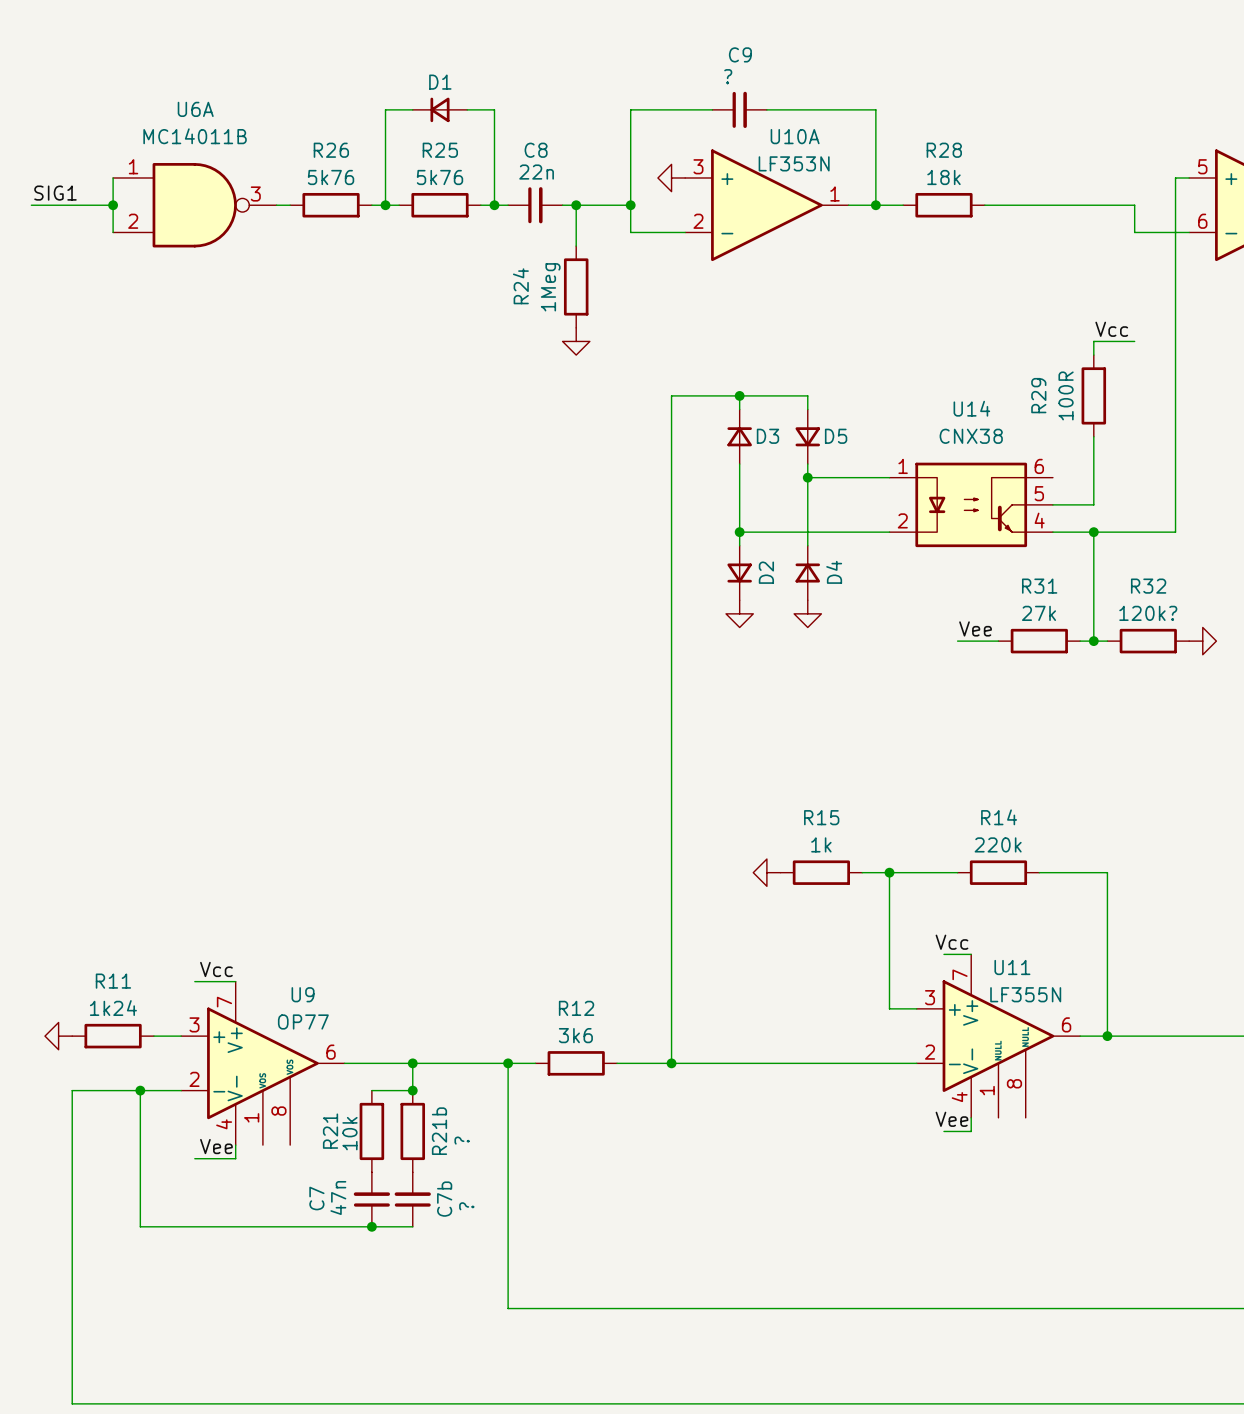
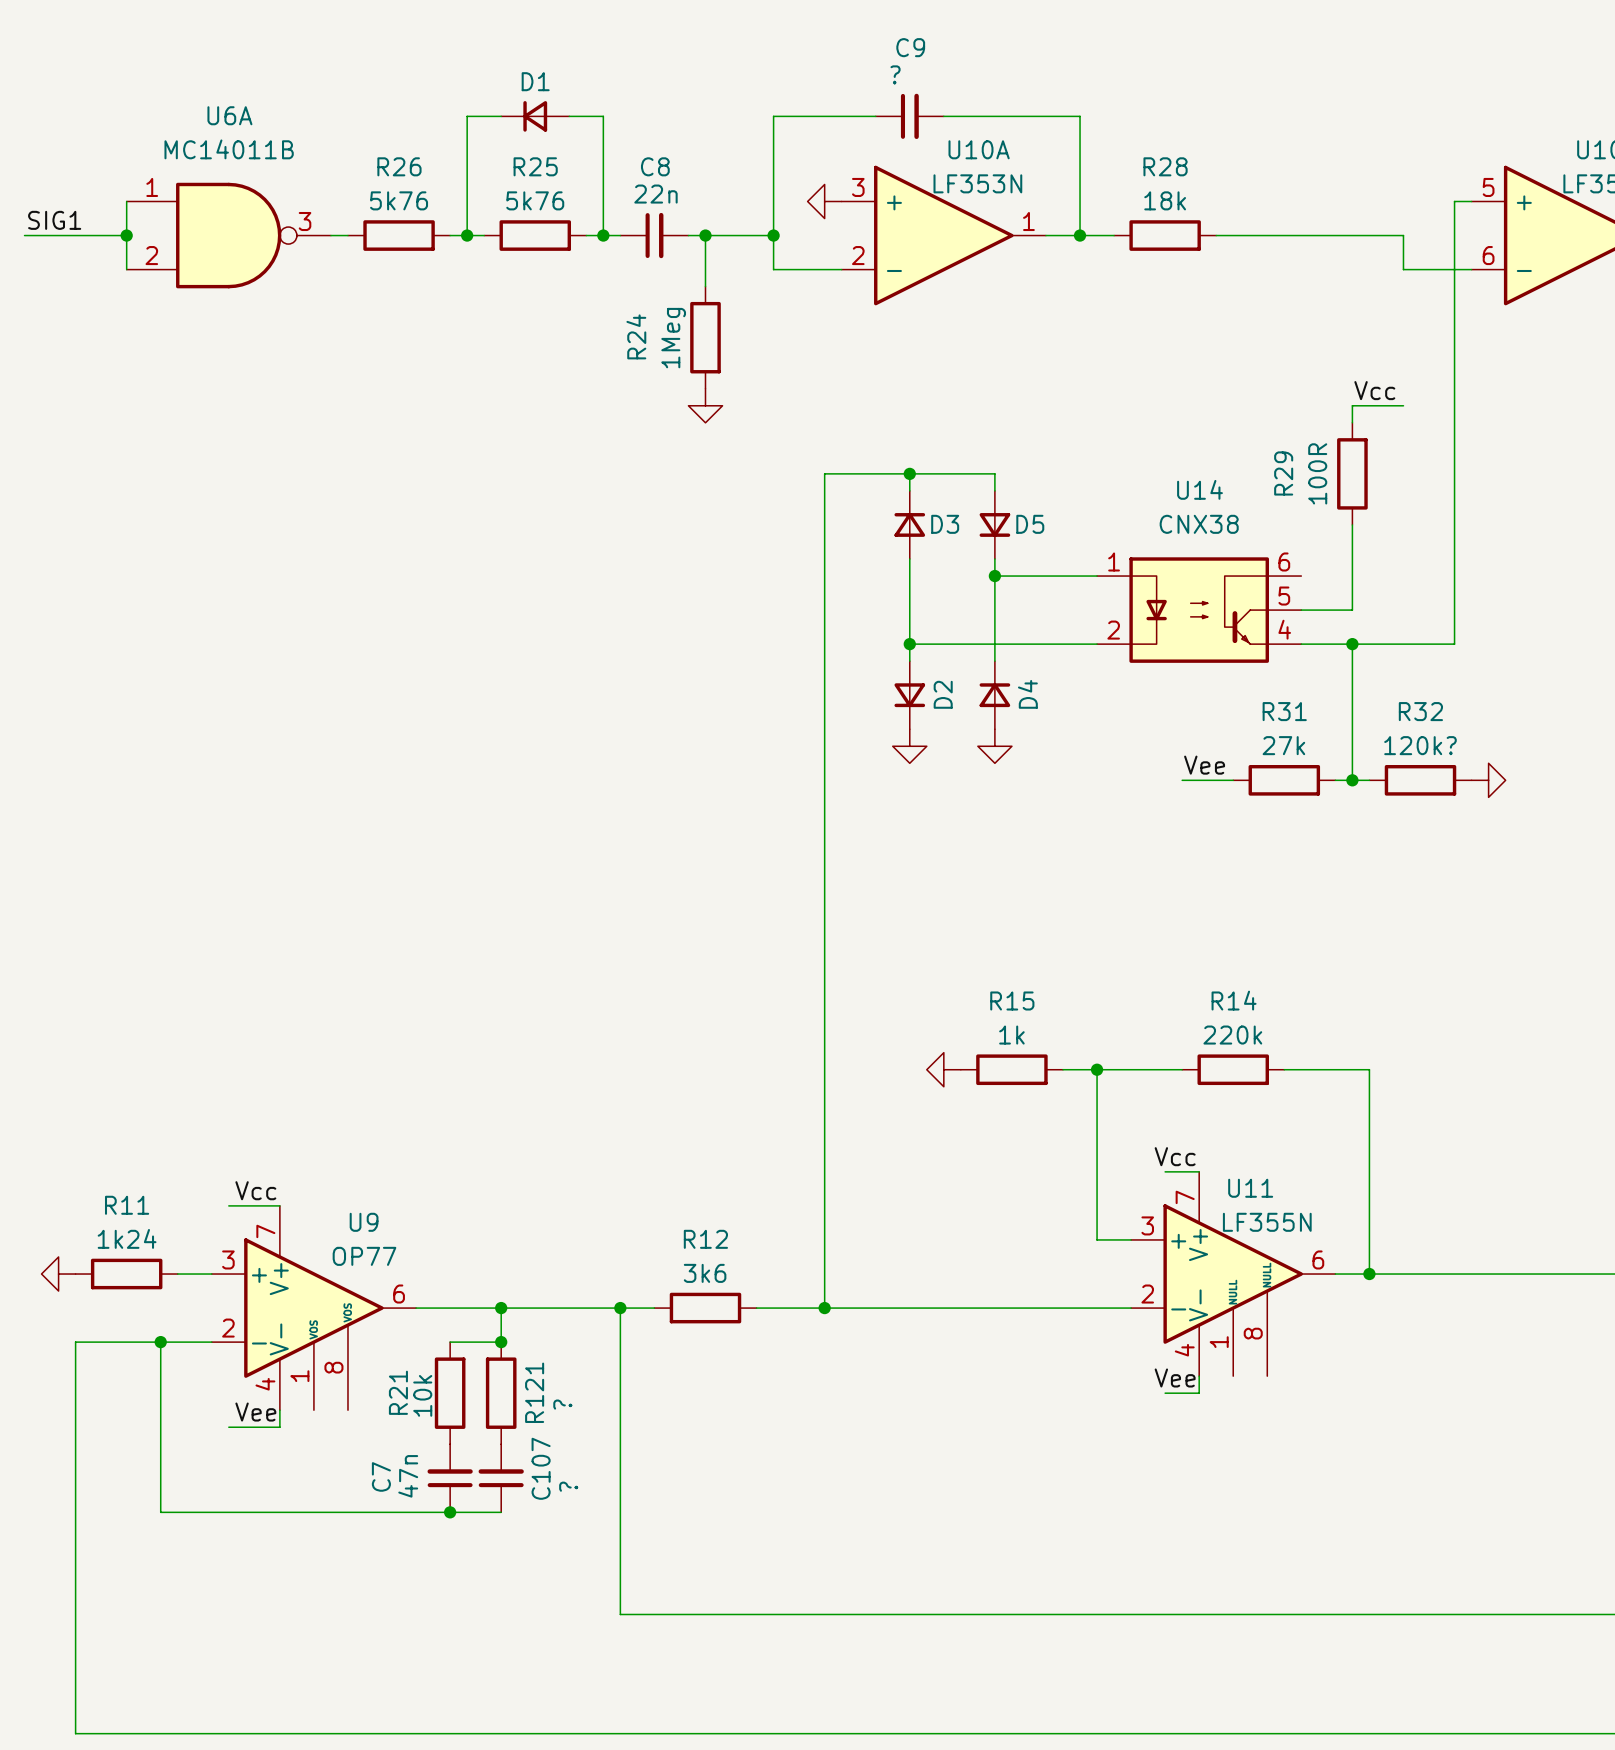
R21b name: R21b (439, 1131) -> R121 (534, 1392)
C7b name: C7b (444, 1199) -> C107 (541, 1468)

